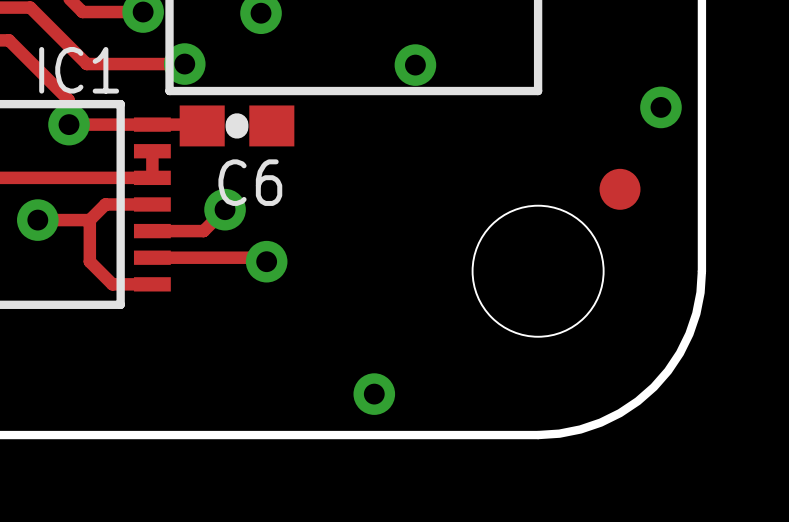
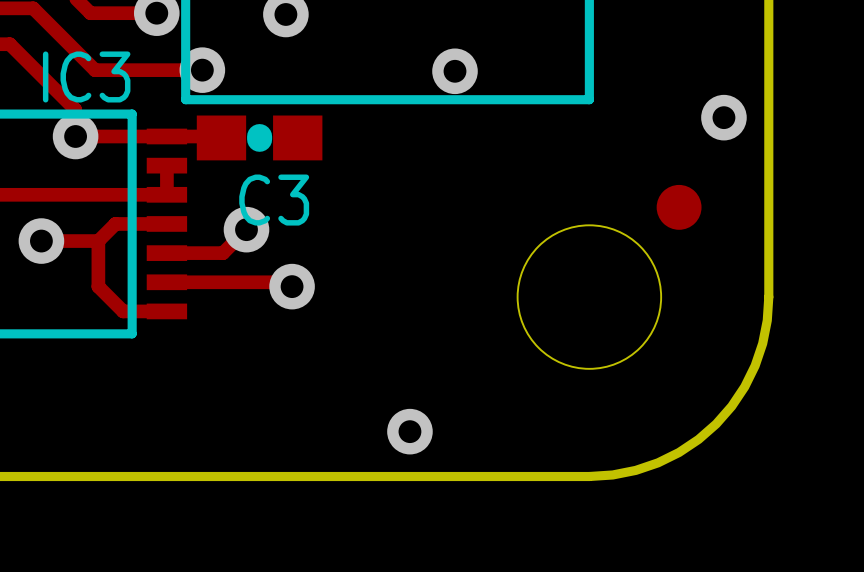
IC1 name: IC1 (79, 70) -> IC3 (86, 76)
C6 name: C6 (250, 182) -> C3 (274, 200)

